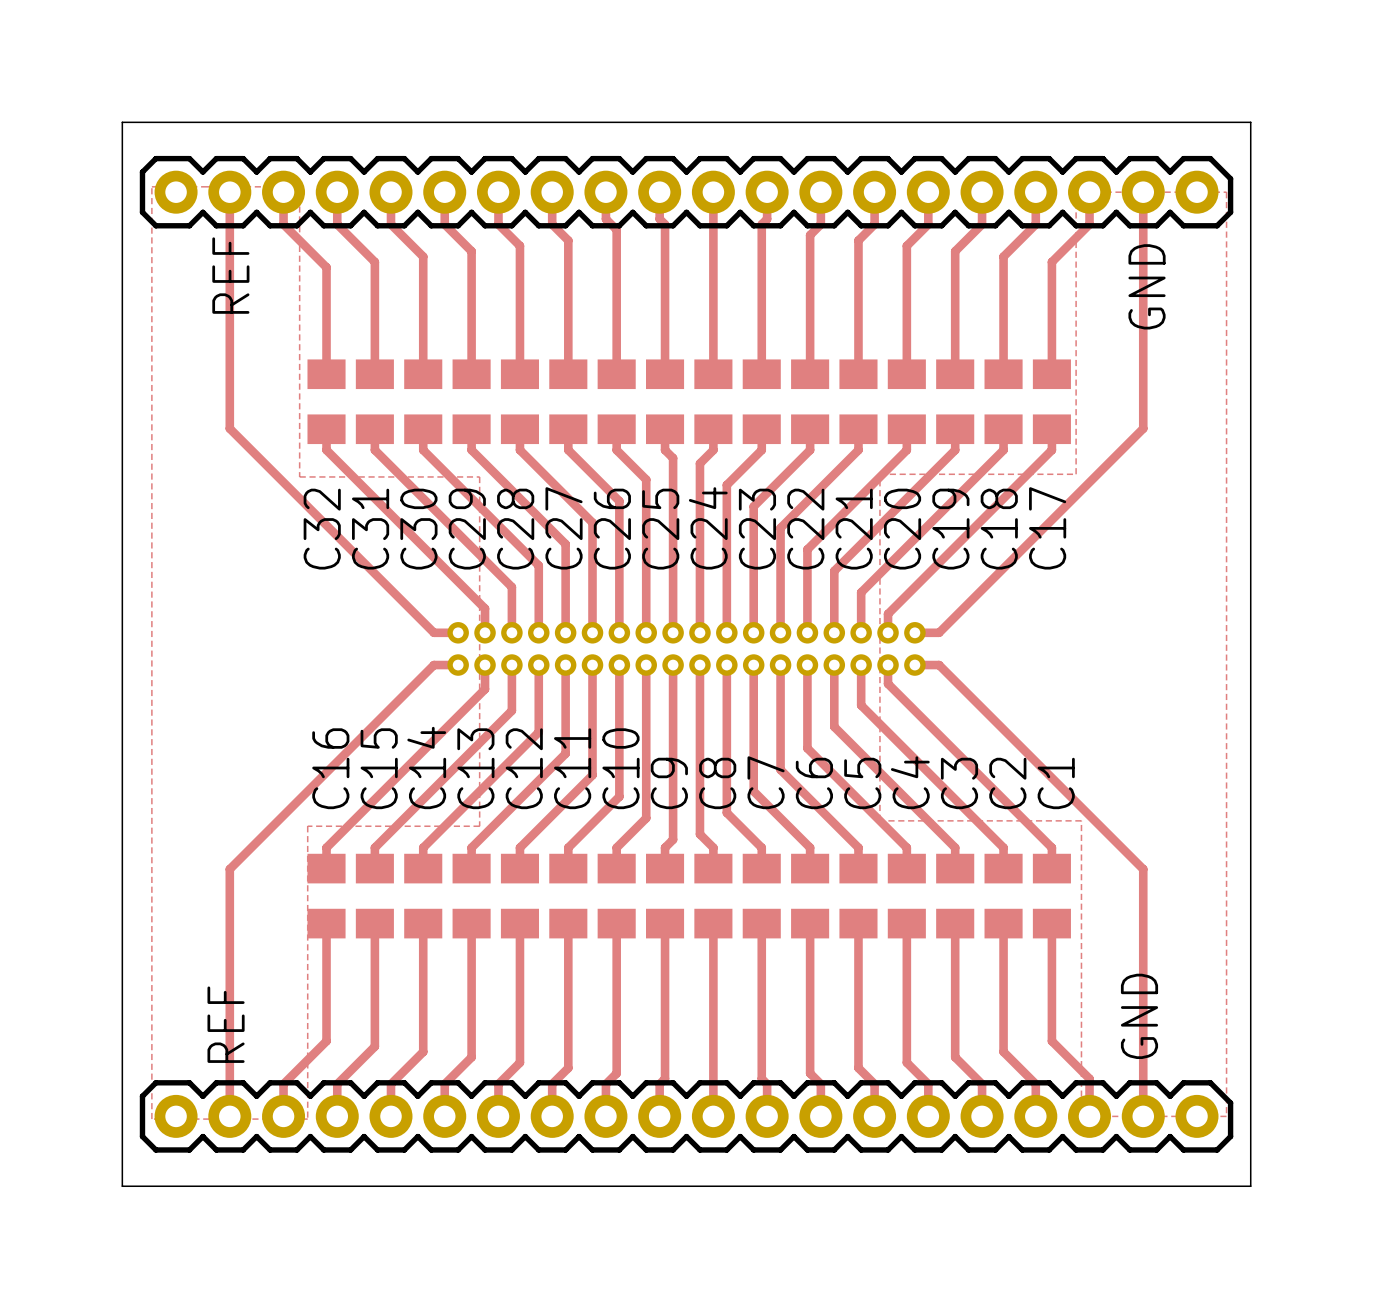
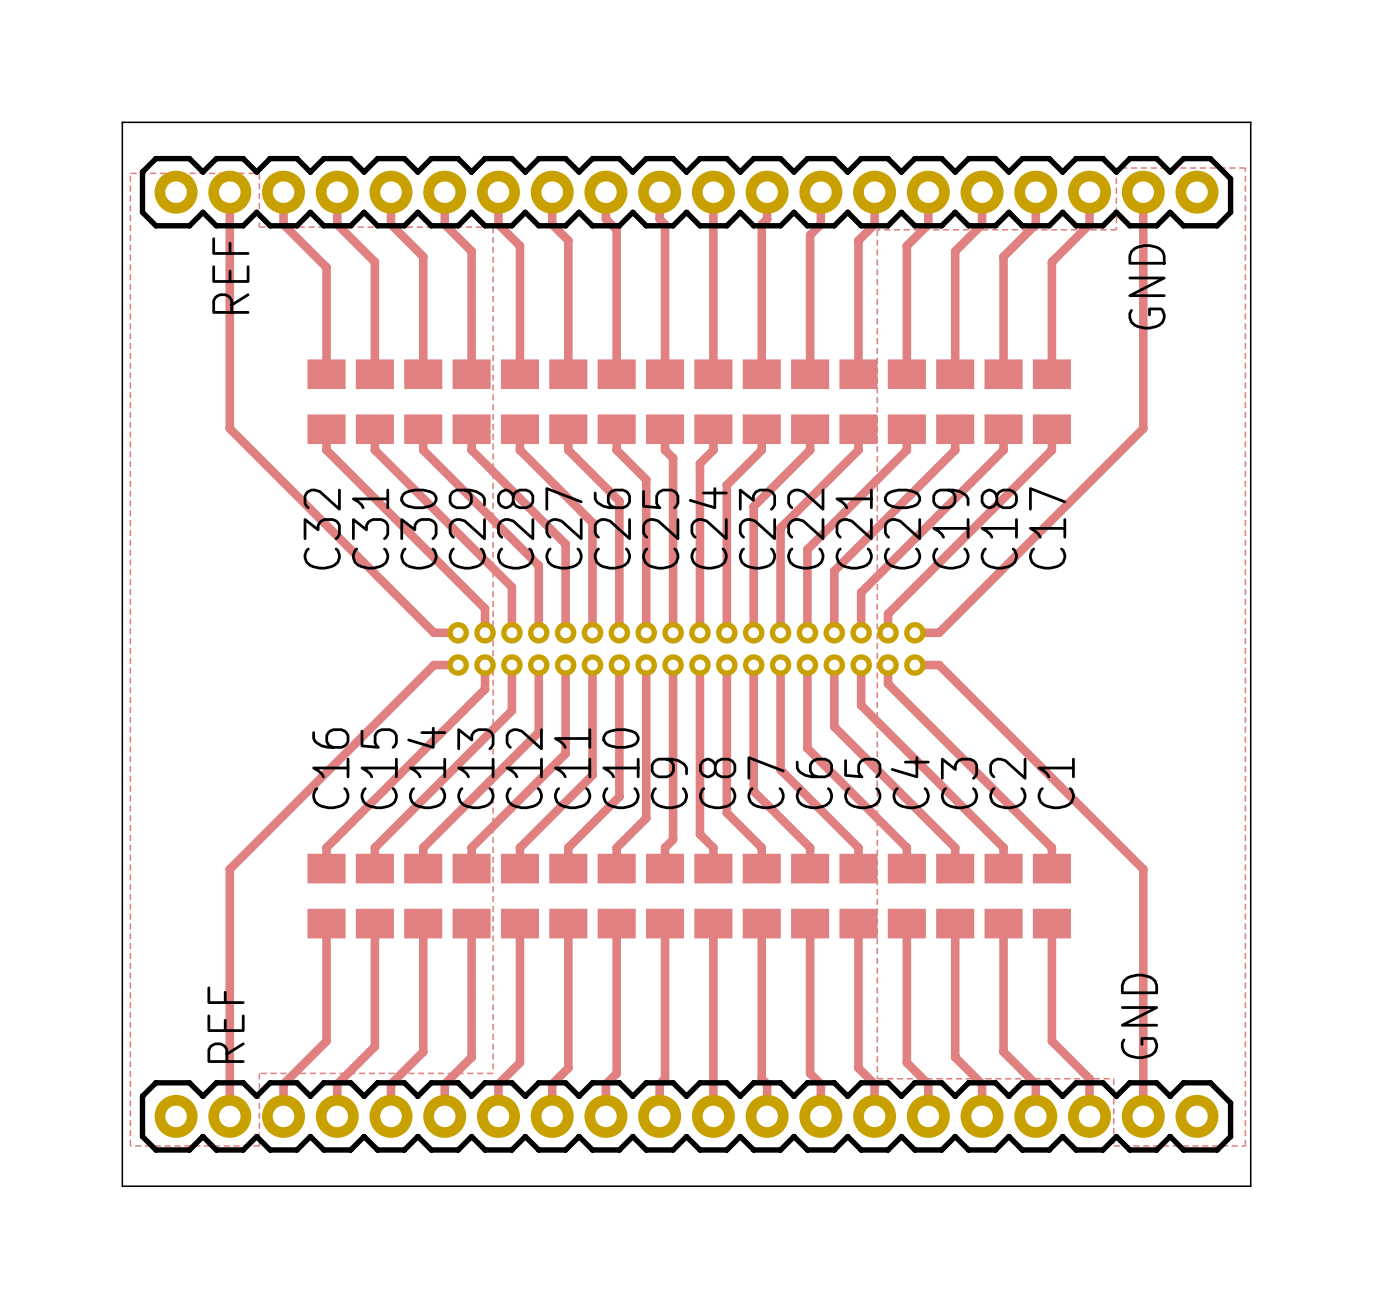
zone outline: (151, 186) (299, 186) (299, 476) (479, 476) (479, 826) (307, 826) (307, 1119) (151, 1119) (151, 186) -> (130, 173) (130, 1145) (259, 1145) (259, 1073) (493, 1073) (493, 227) (259, 227) (259, 173) (130, 173)
zone outline: (1076, 192) (1226, 192) (1226, 1116) (1081, 1116) (1081, 820) (879, 820) (879, 474) (1076, 474) (1076, 192) -> (1116, 168) (1116, 229) (877, 229) (877, 1078) (1113, 1078) (1113, 1145) (1245, 1145) (1245, 168) (1116, 168)

